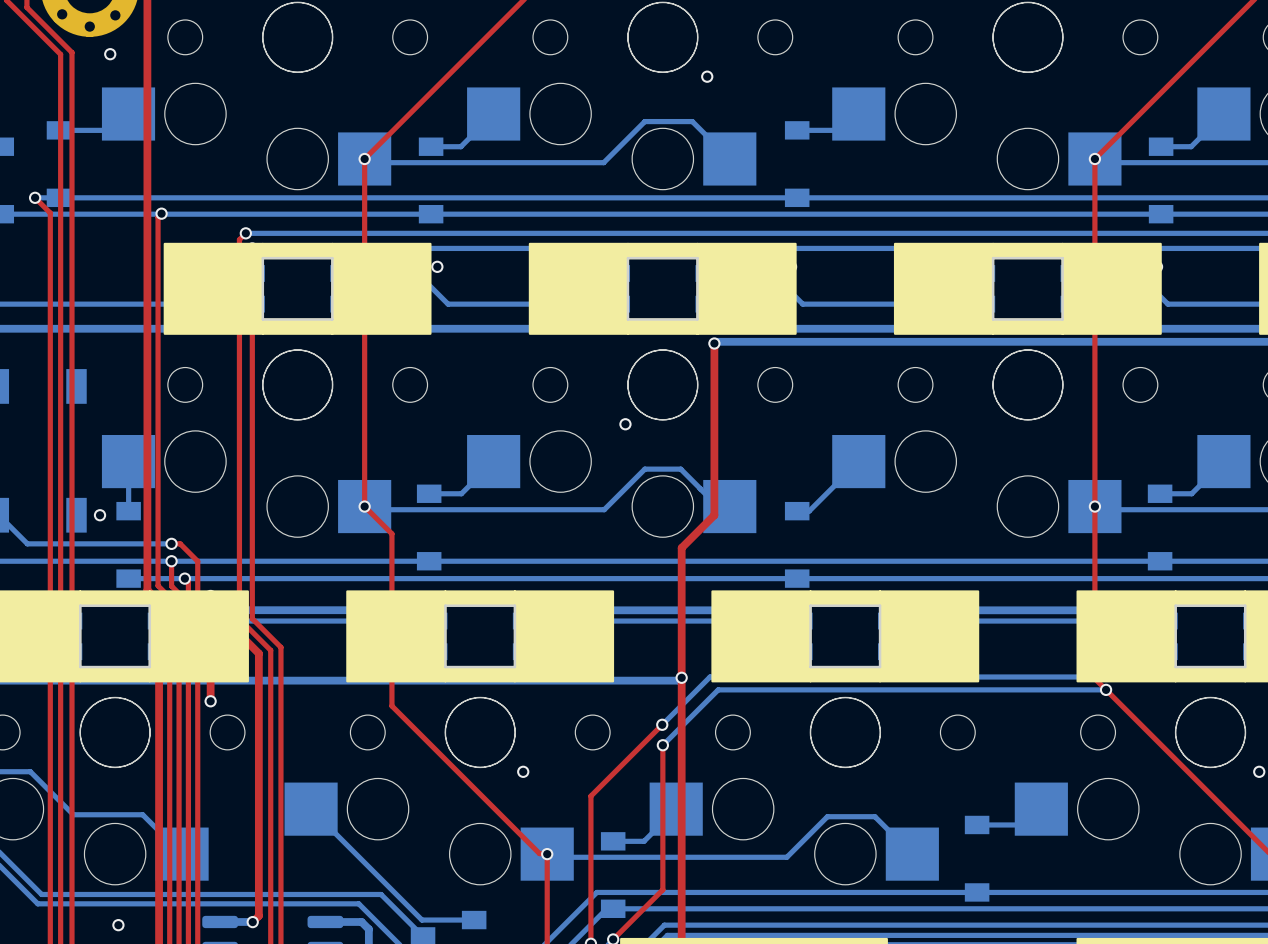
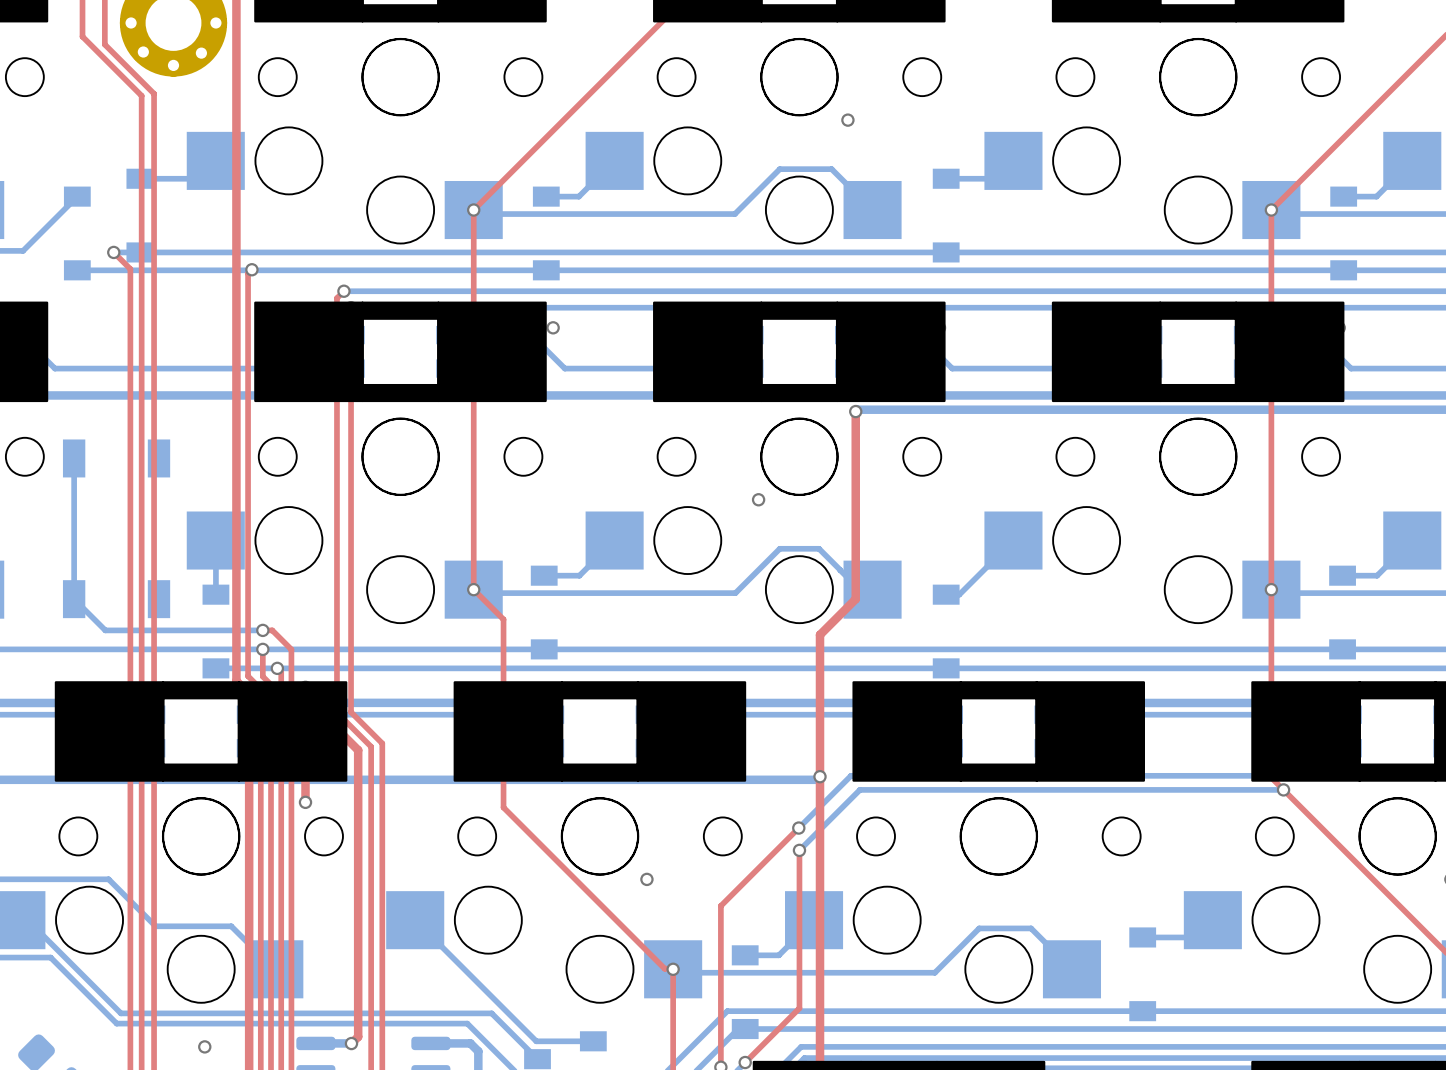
via: (110, 54) -> none
via: (100, 515) -> none

